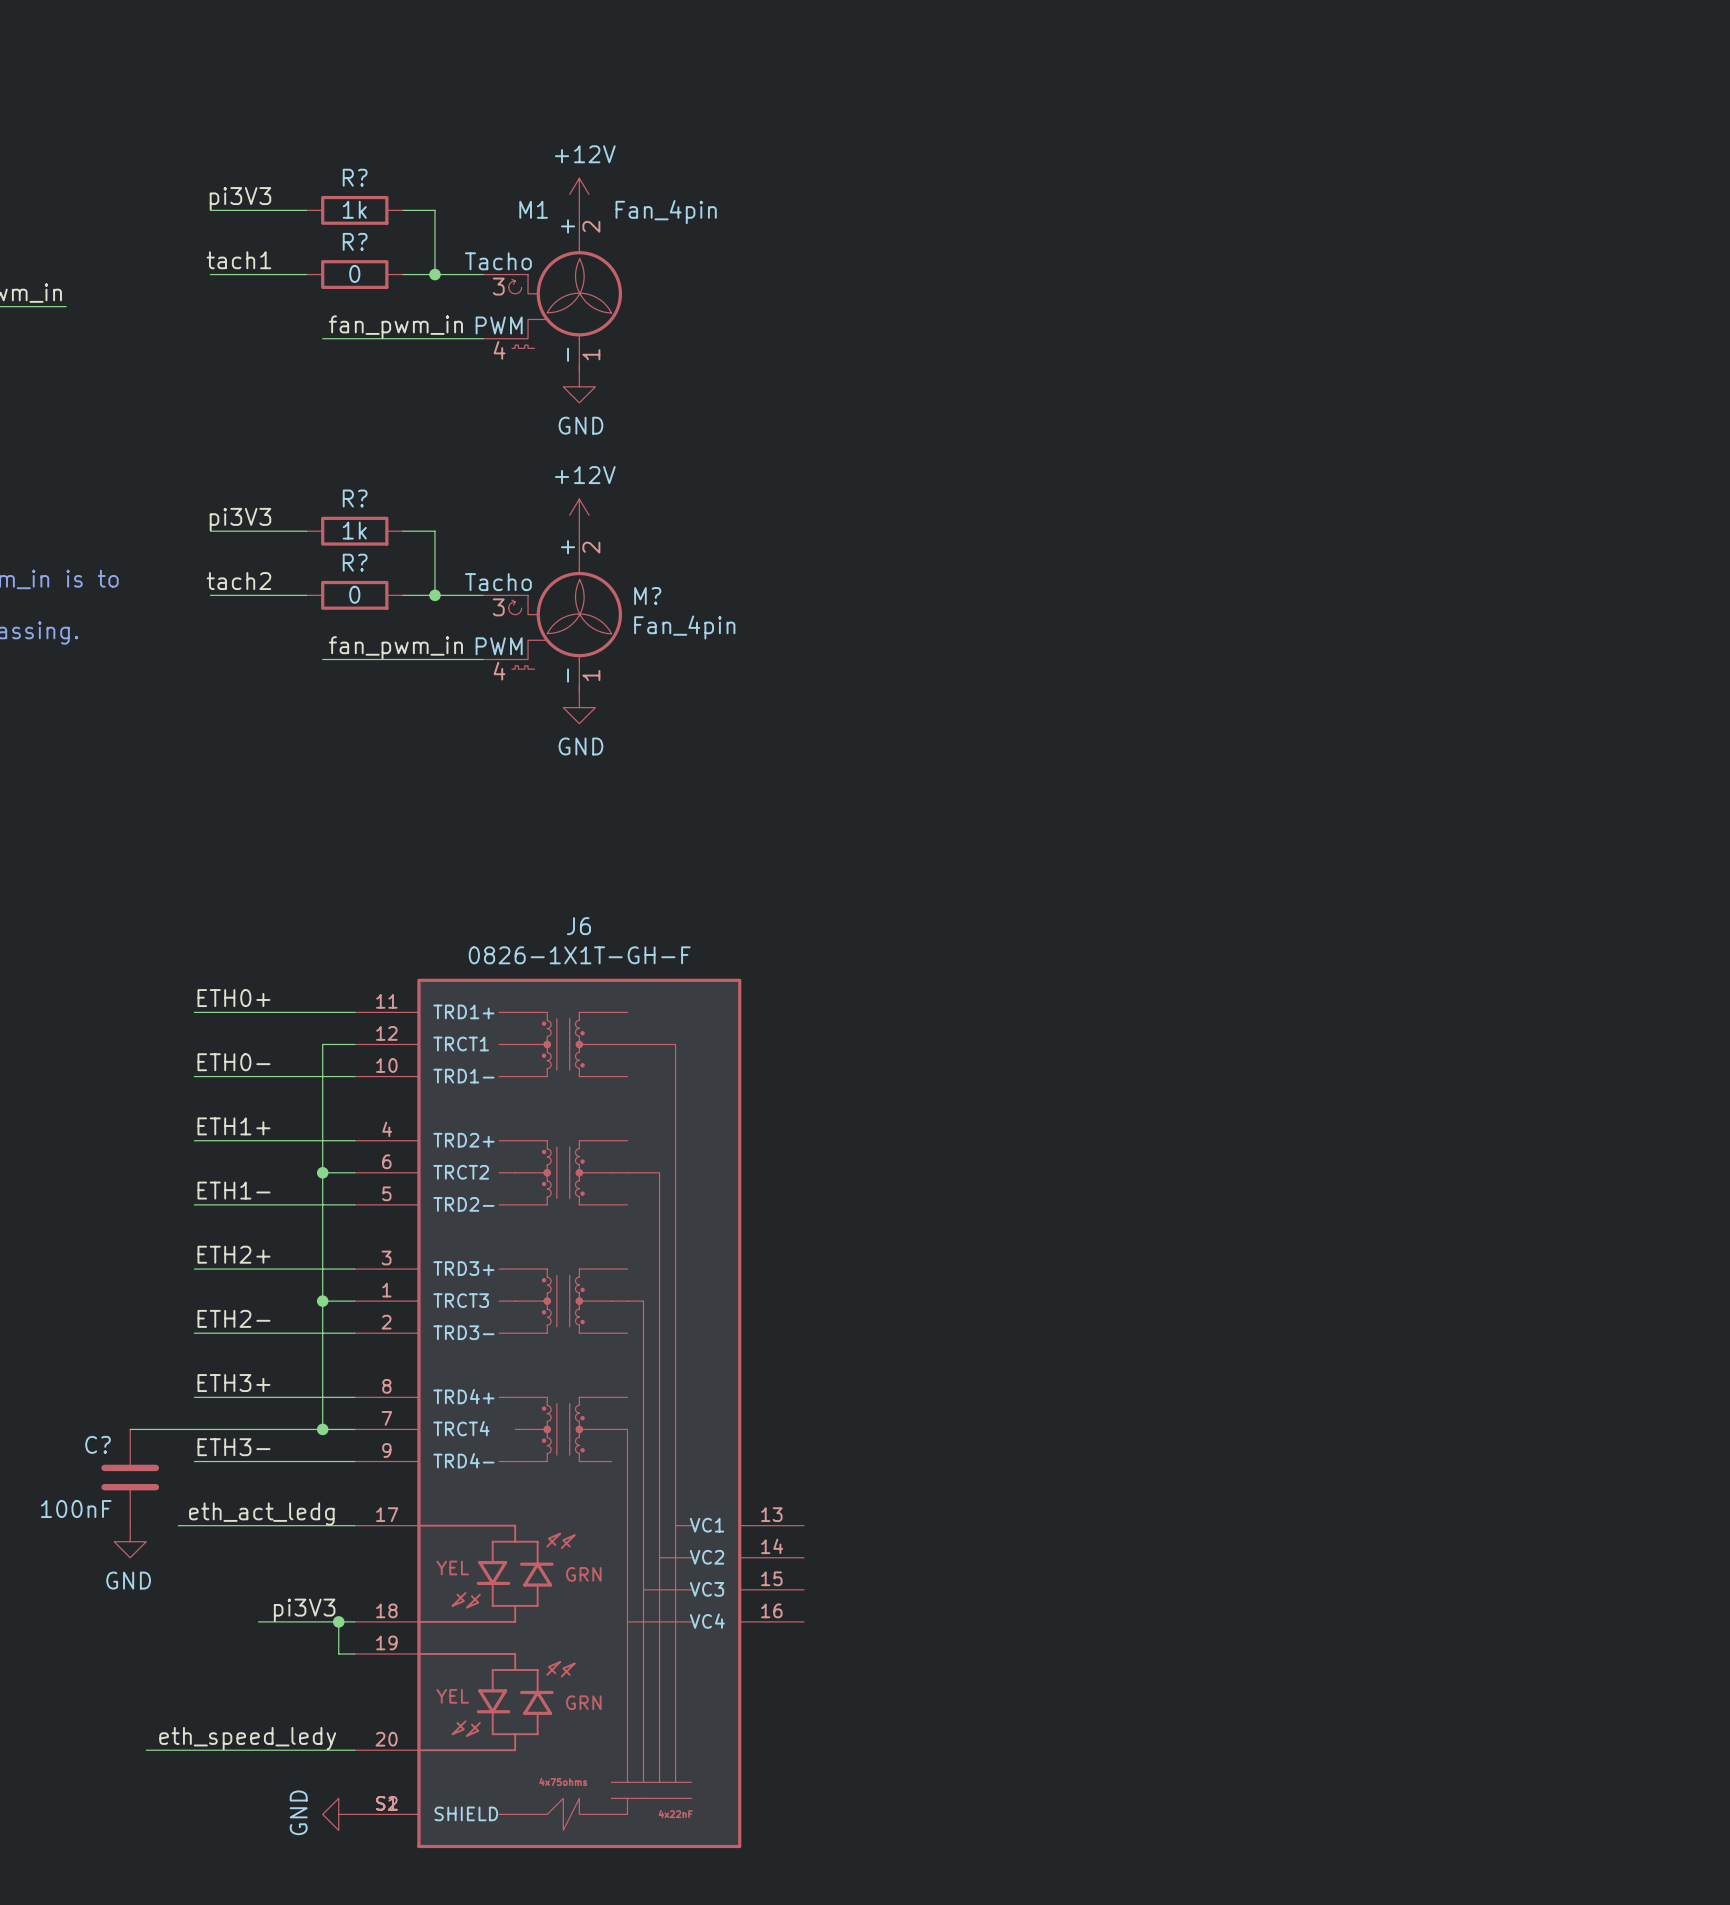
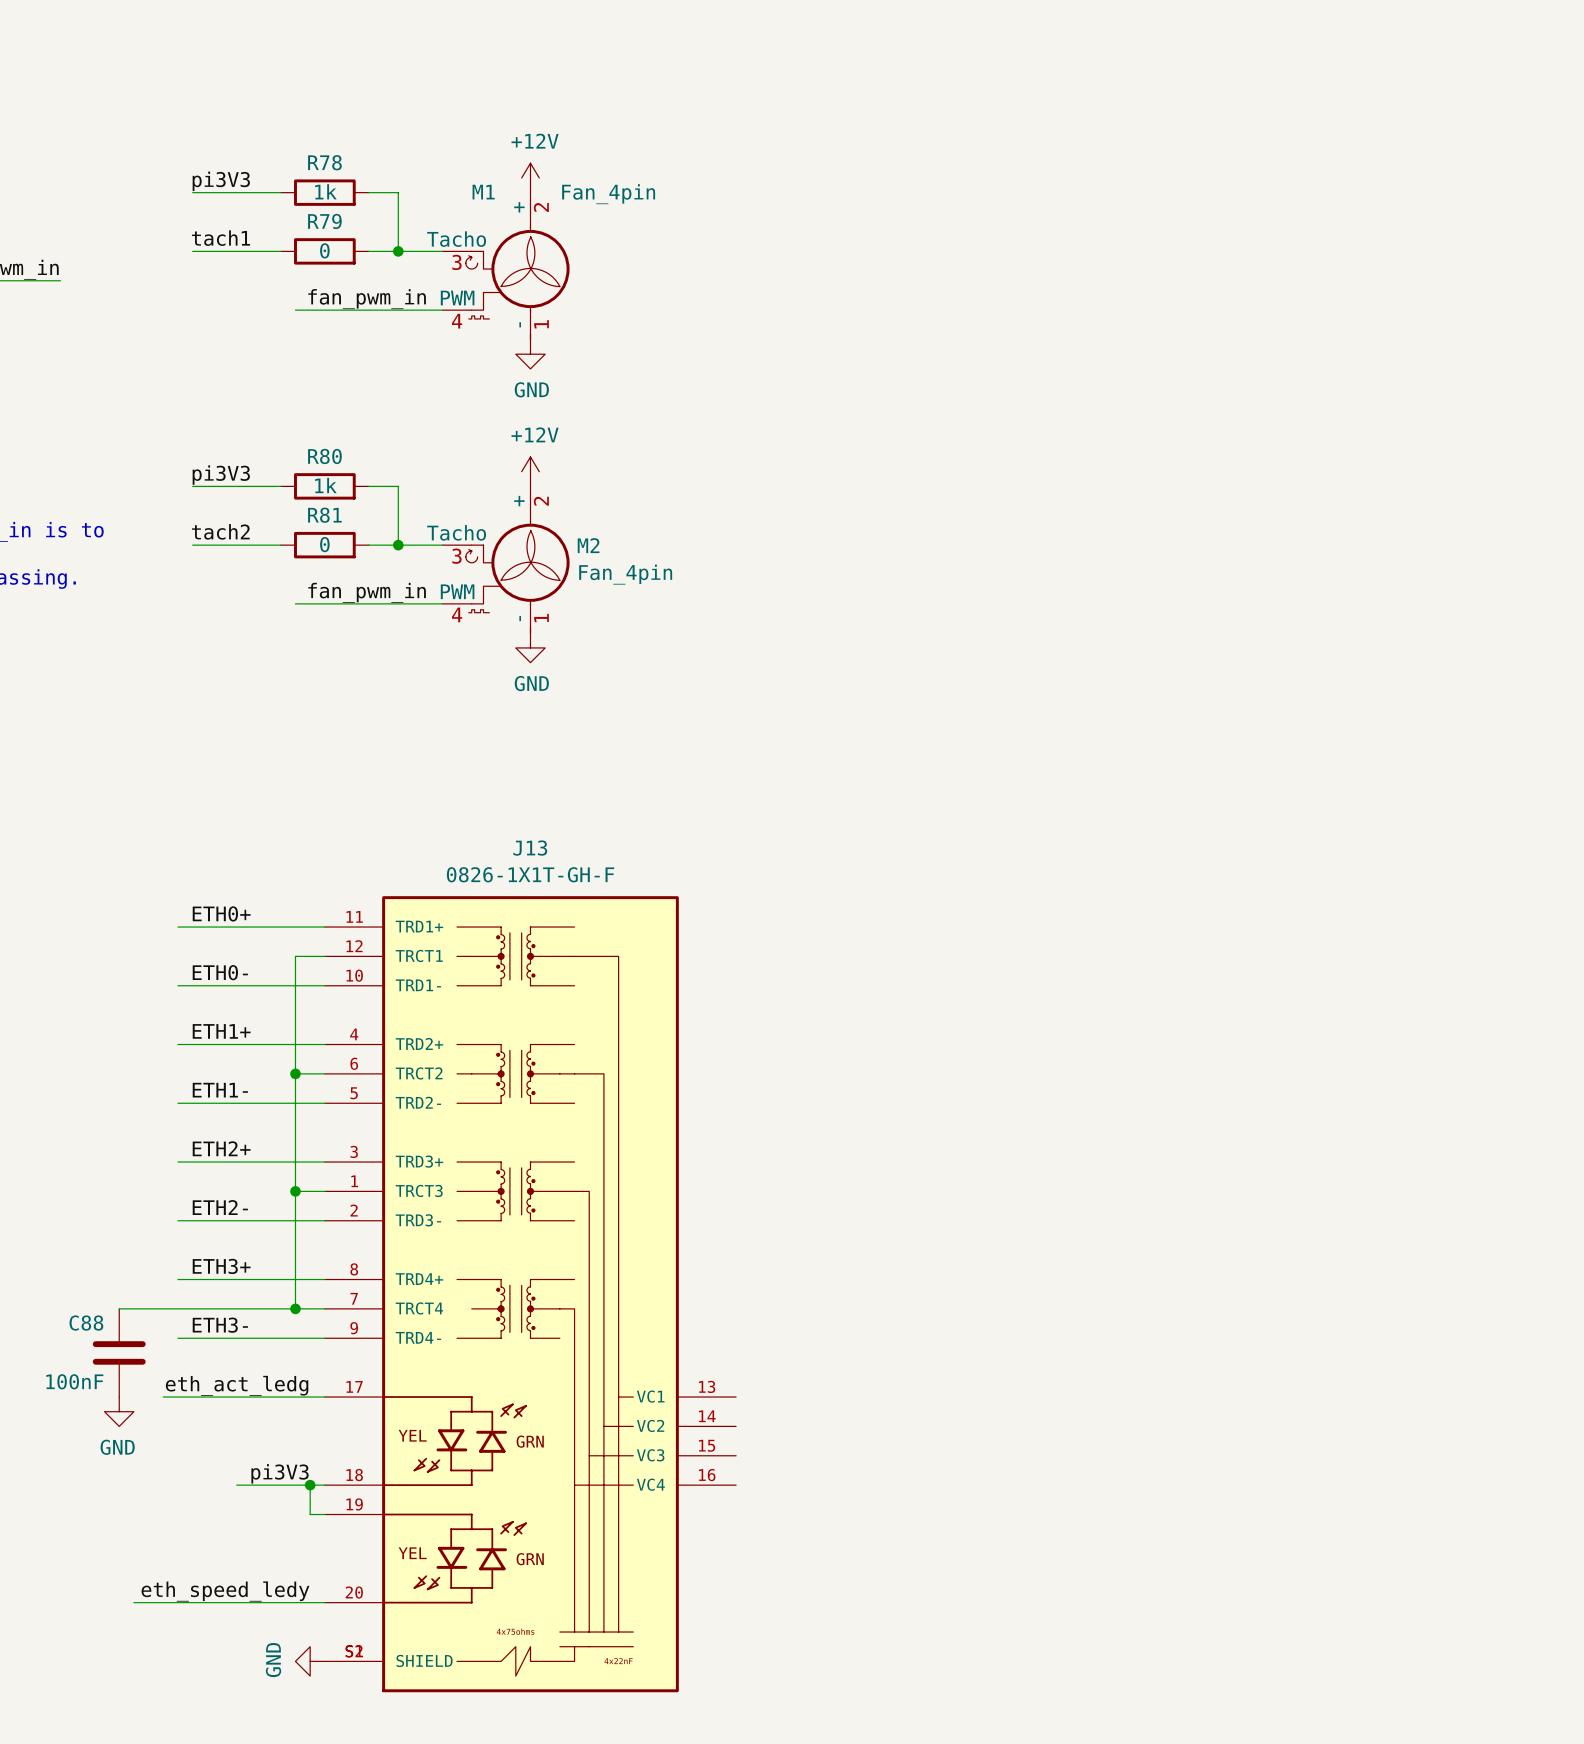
R? name: R? (355, 177) -> R78 (324, 162)
R? name: R? (355, 241) -> R79 (324, 221)
R? name: R? (355, 498) -> R80 (324, 456)
R? name: R? (355, 562) -> R81 (324, 515)
M? name: M? (647, 596) -> M2 (588, 545)
J6 name: J6 (578, 926) -> J13 (530, 848)
C? name: C? (98, 1444) -> C88 (86, 1323)

